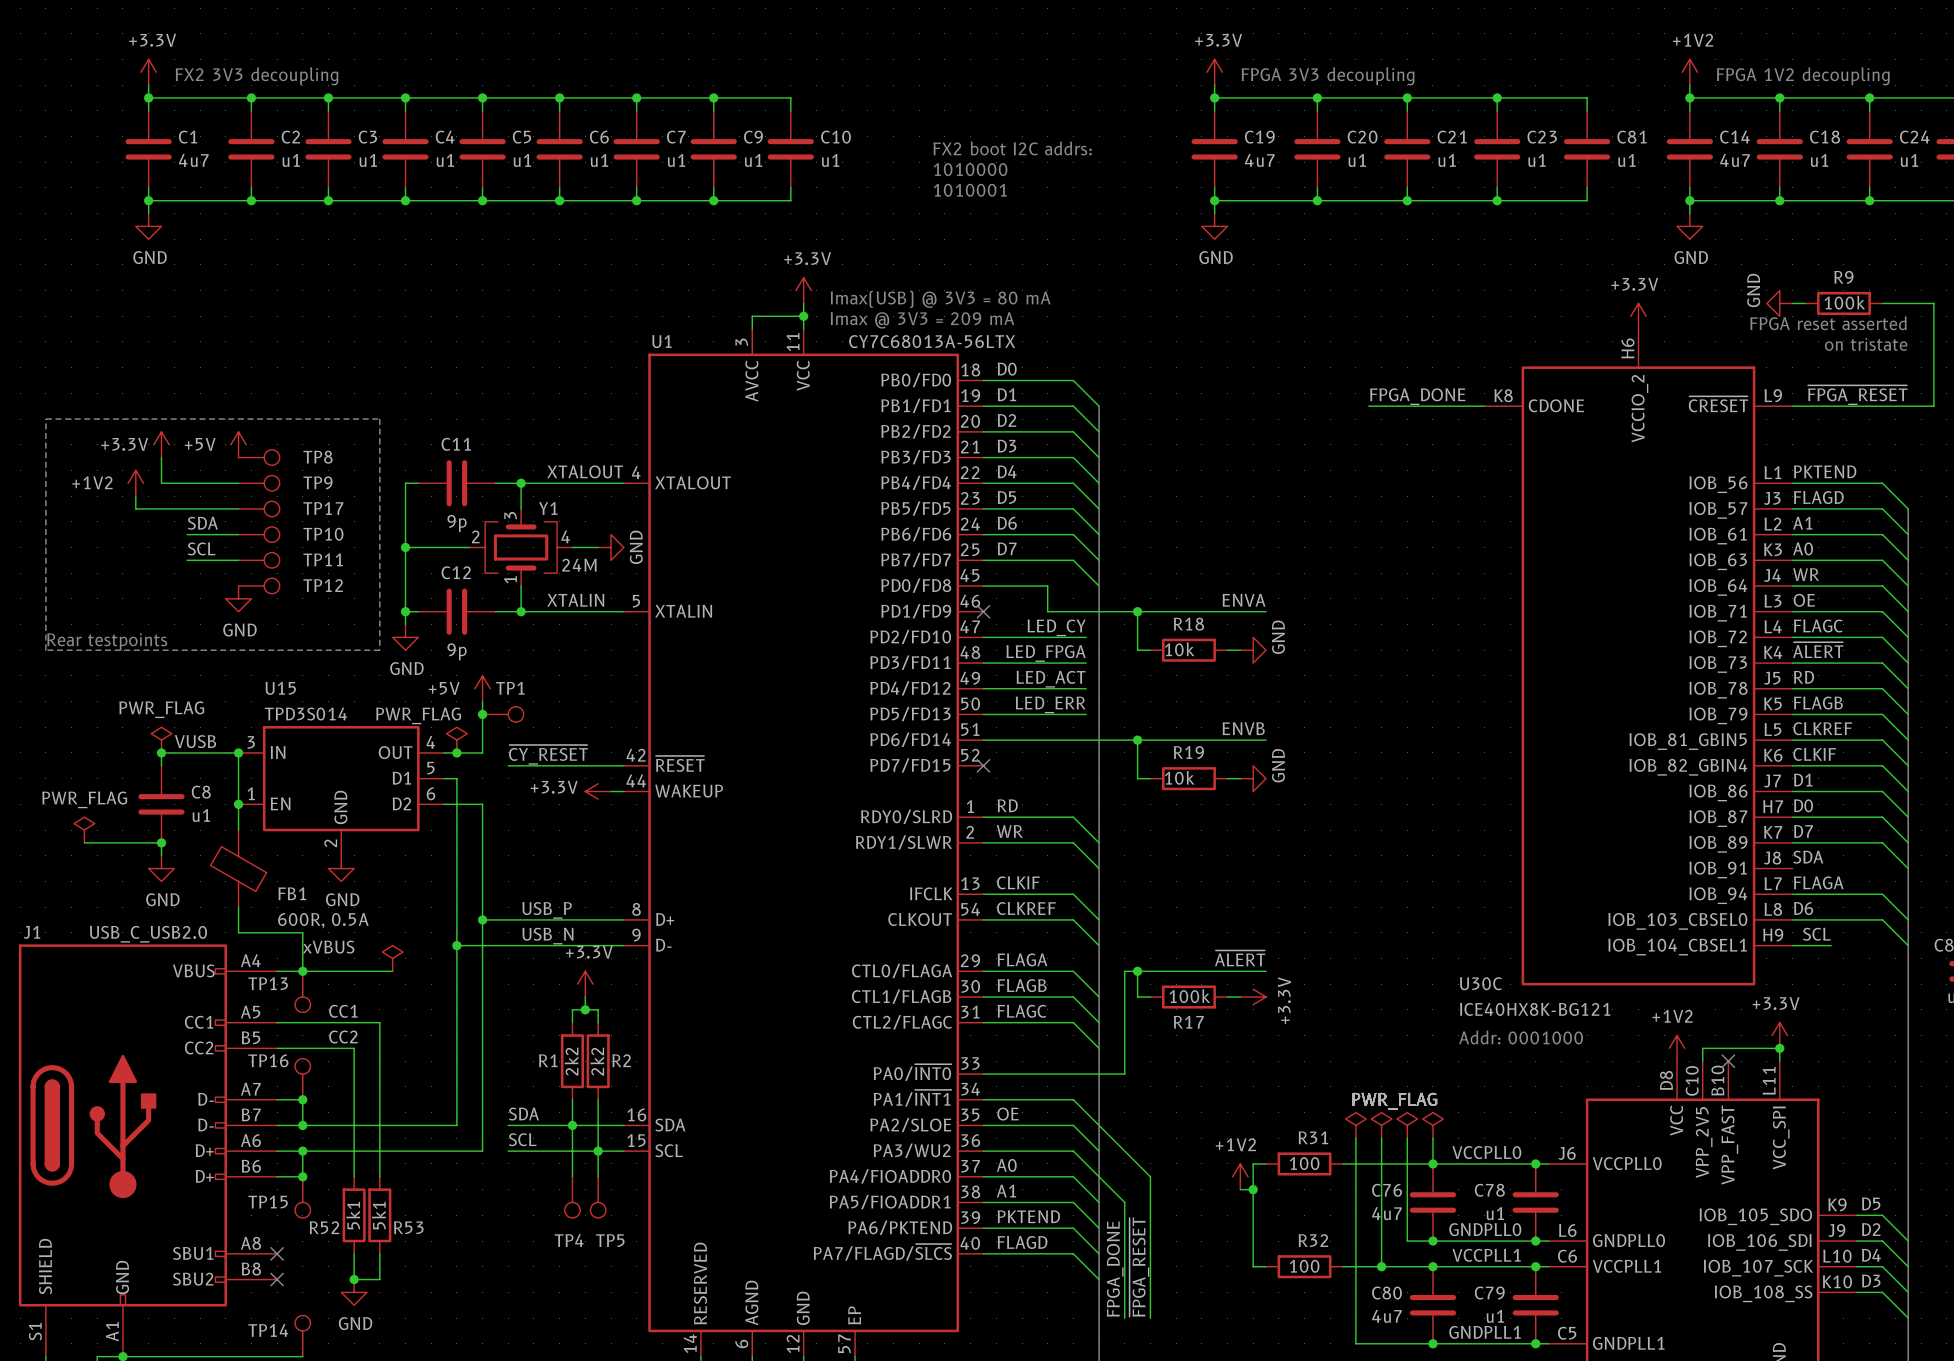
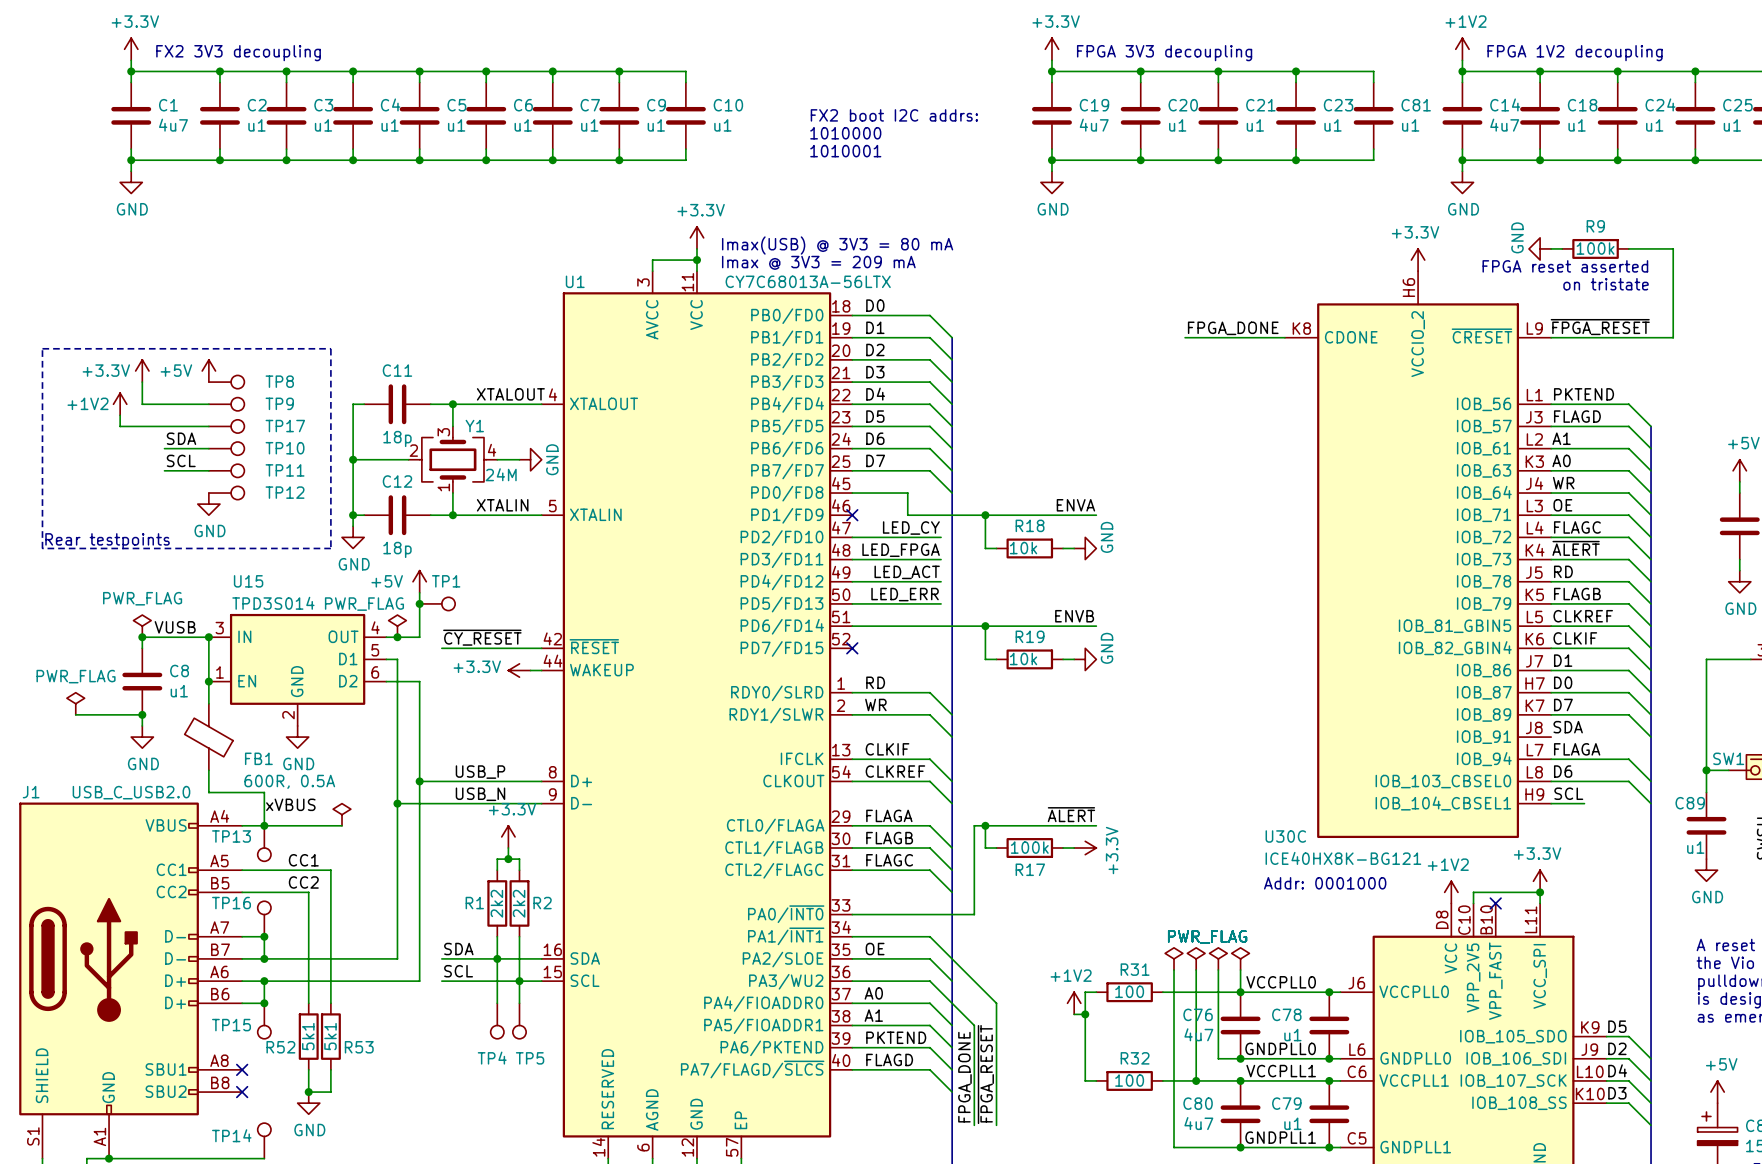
C11 value: 9p (457, 523) -> 18p (397, 438)
C12 value: 9p (457, 651) -> 18p (397, 549)

